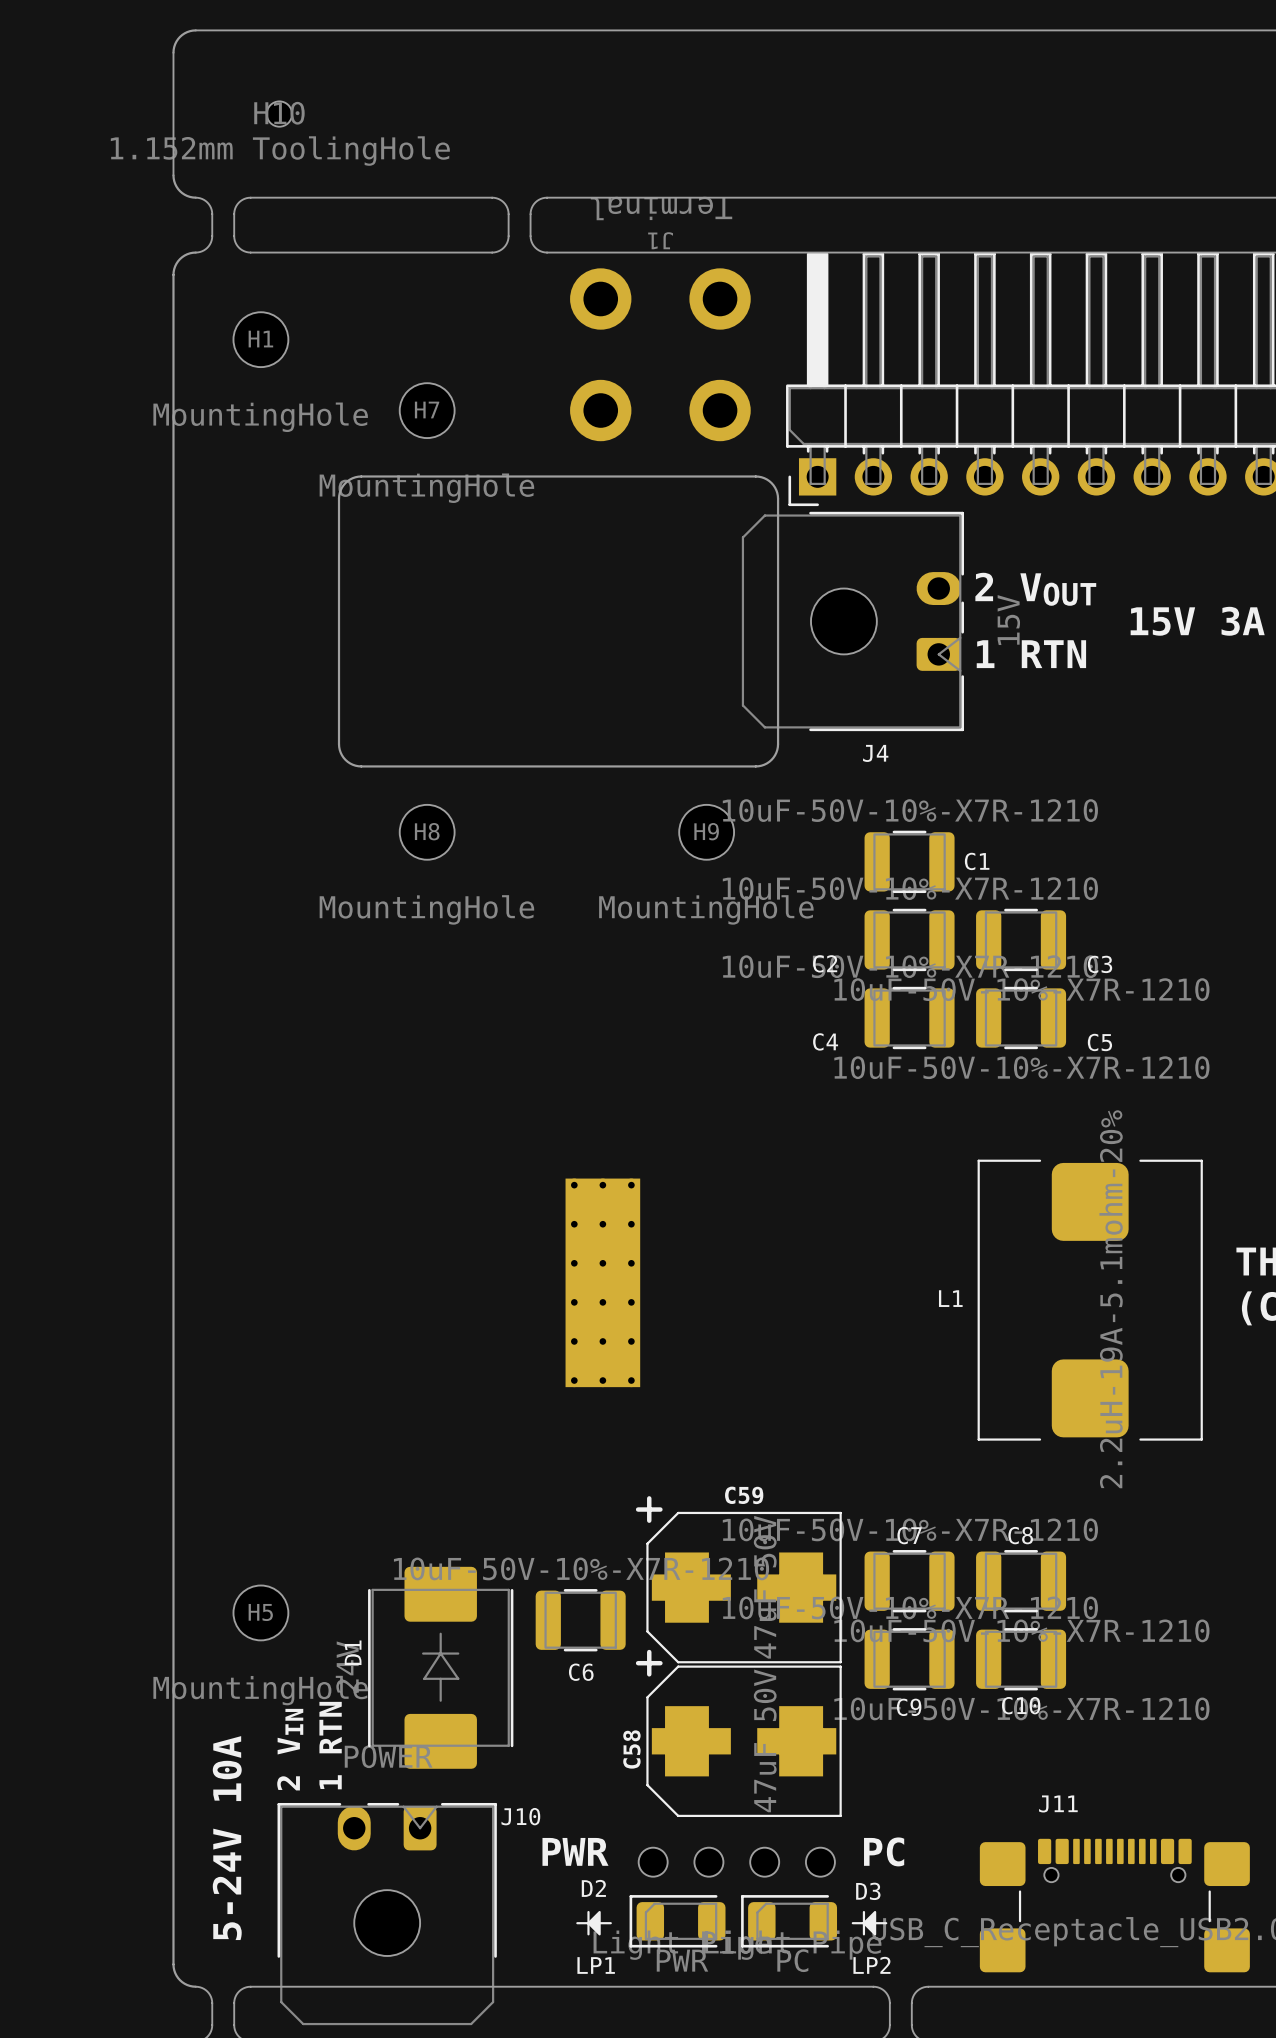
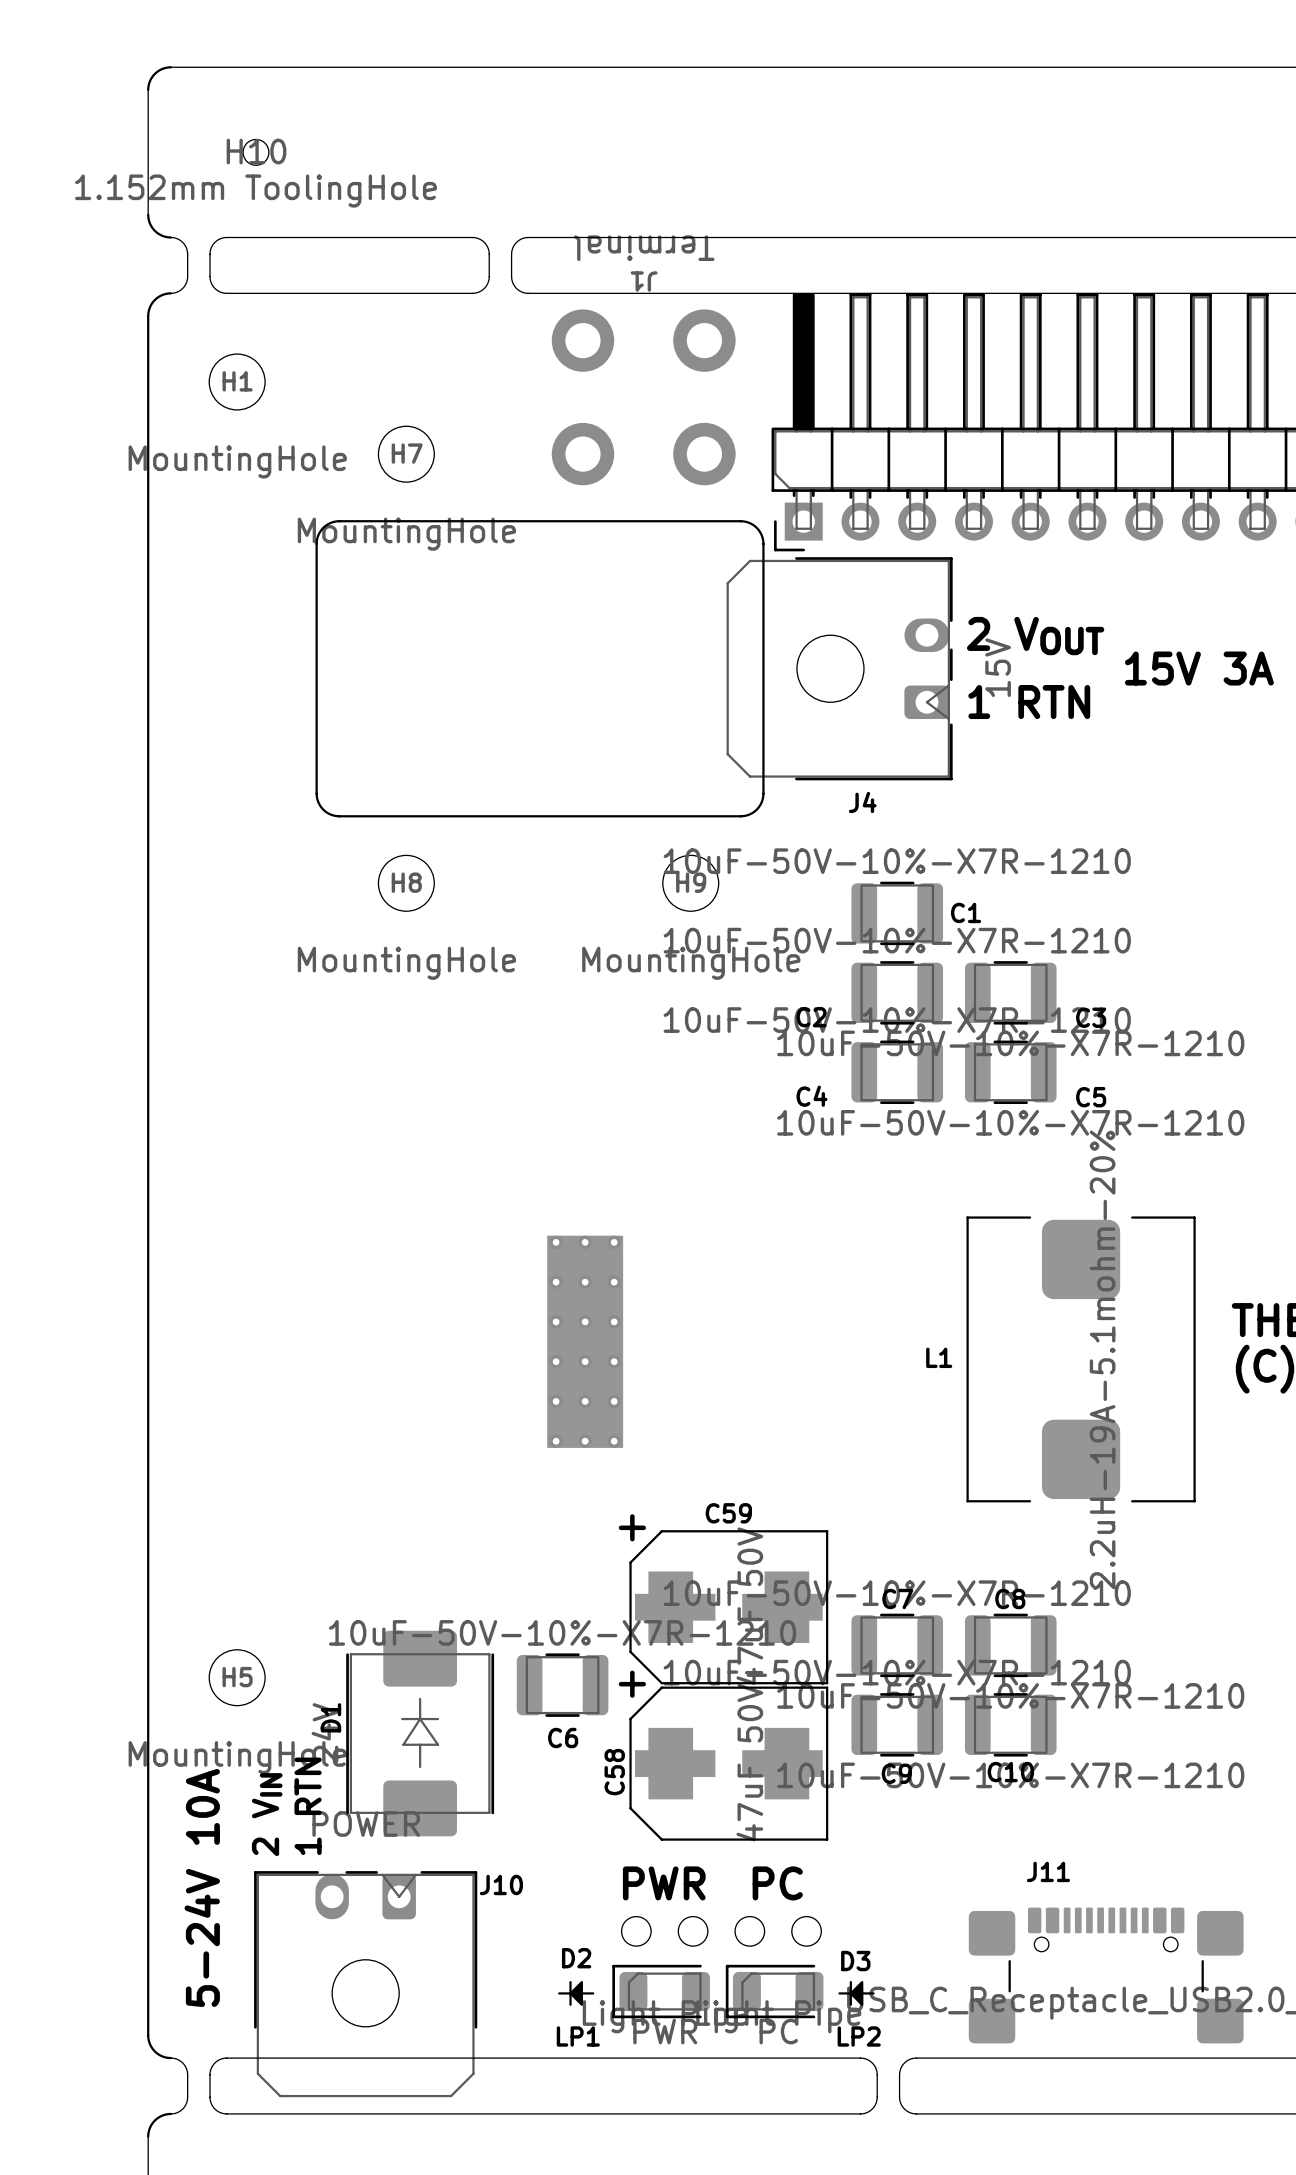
C59 position: (738, 1579) -> (723, 1599)
C58 position: (738, 1733) -> (723, 1755)
text position: PWR (575, 1851) -> PWR (664, 1883)
text position: PC (884, 1851) -> PC (777, 1883)

